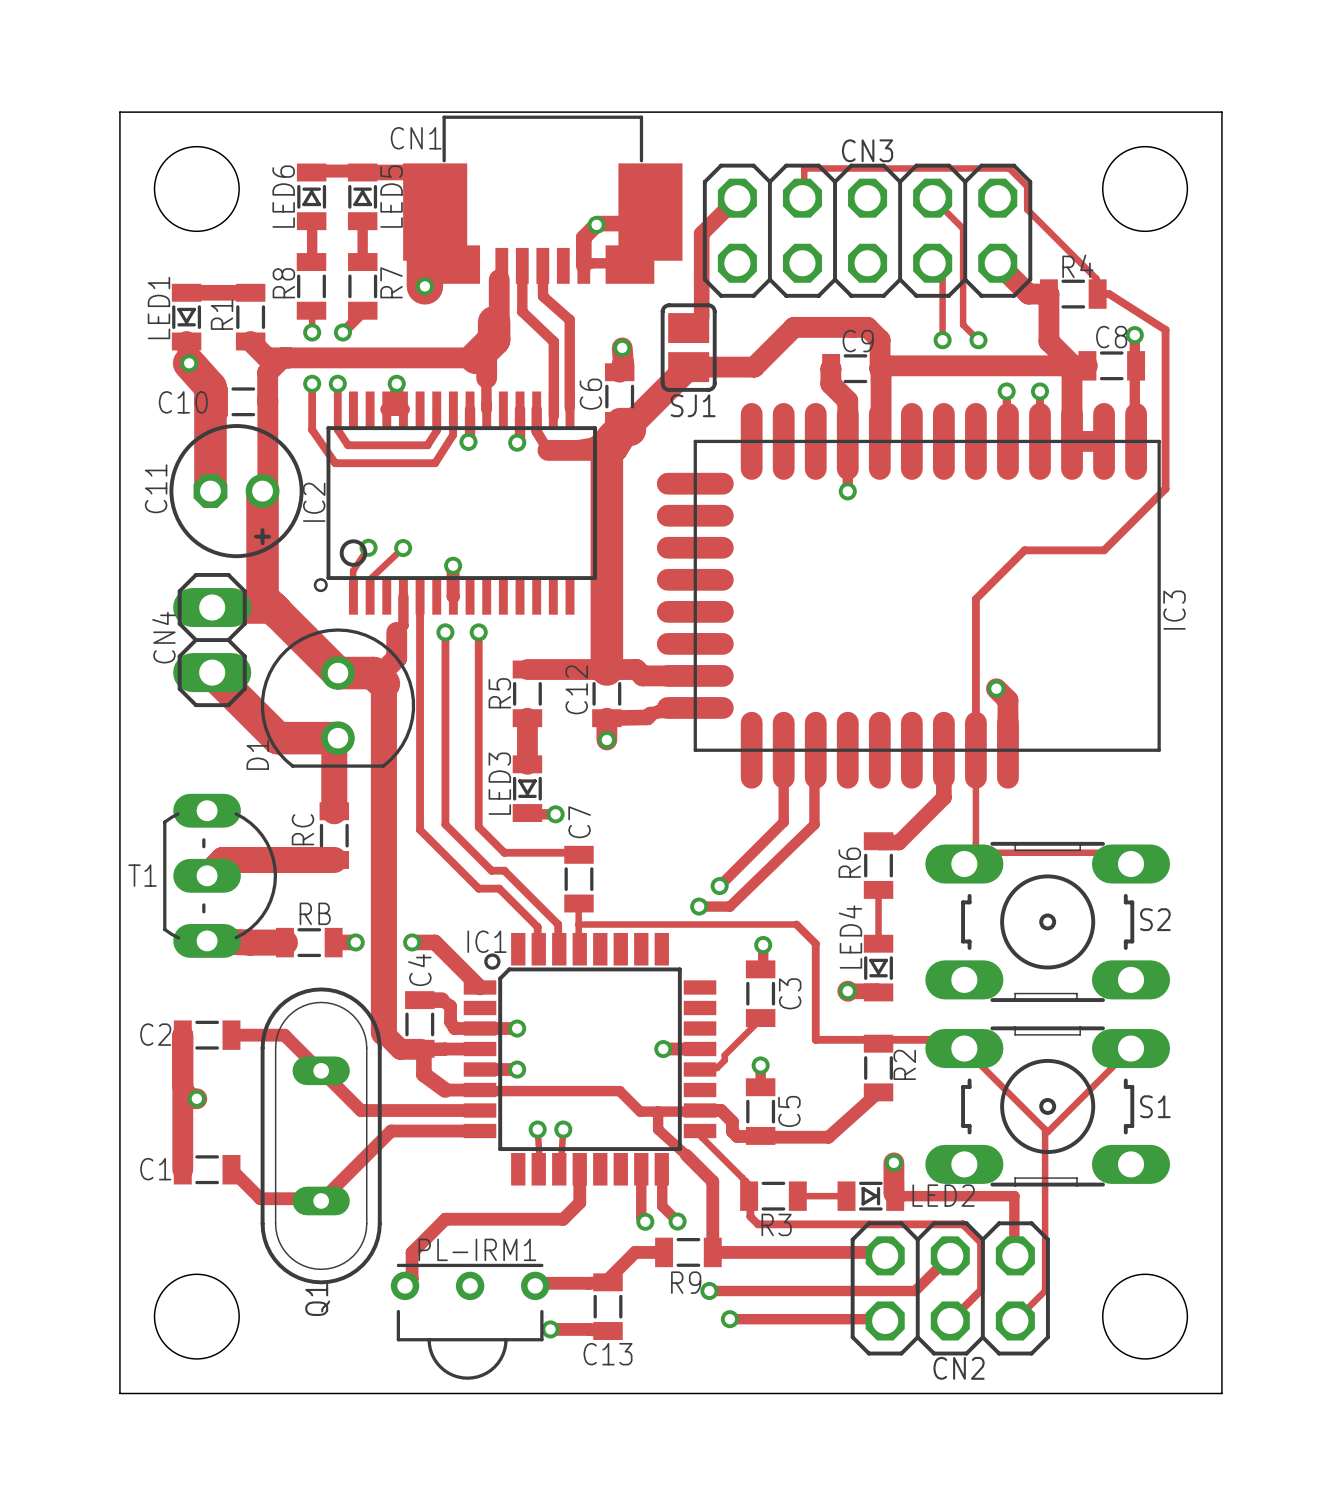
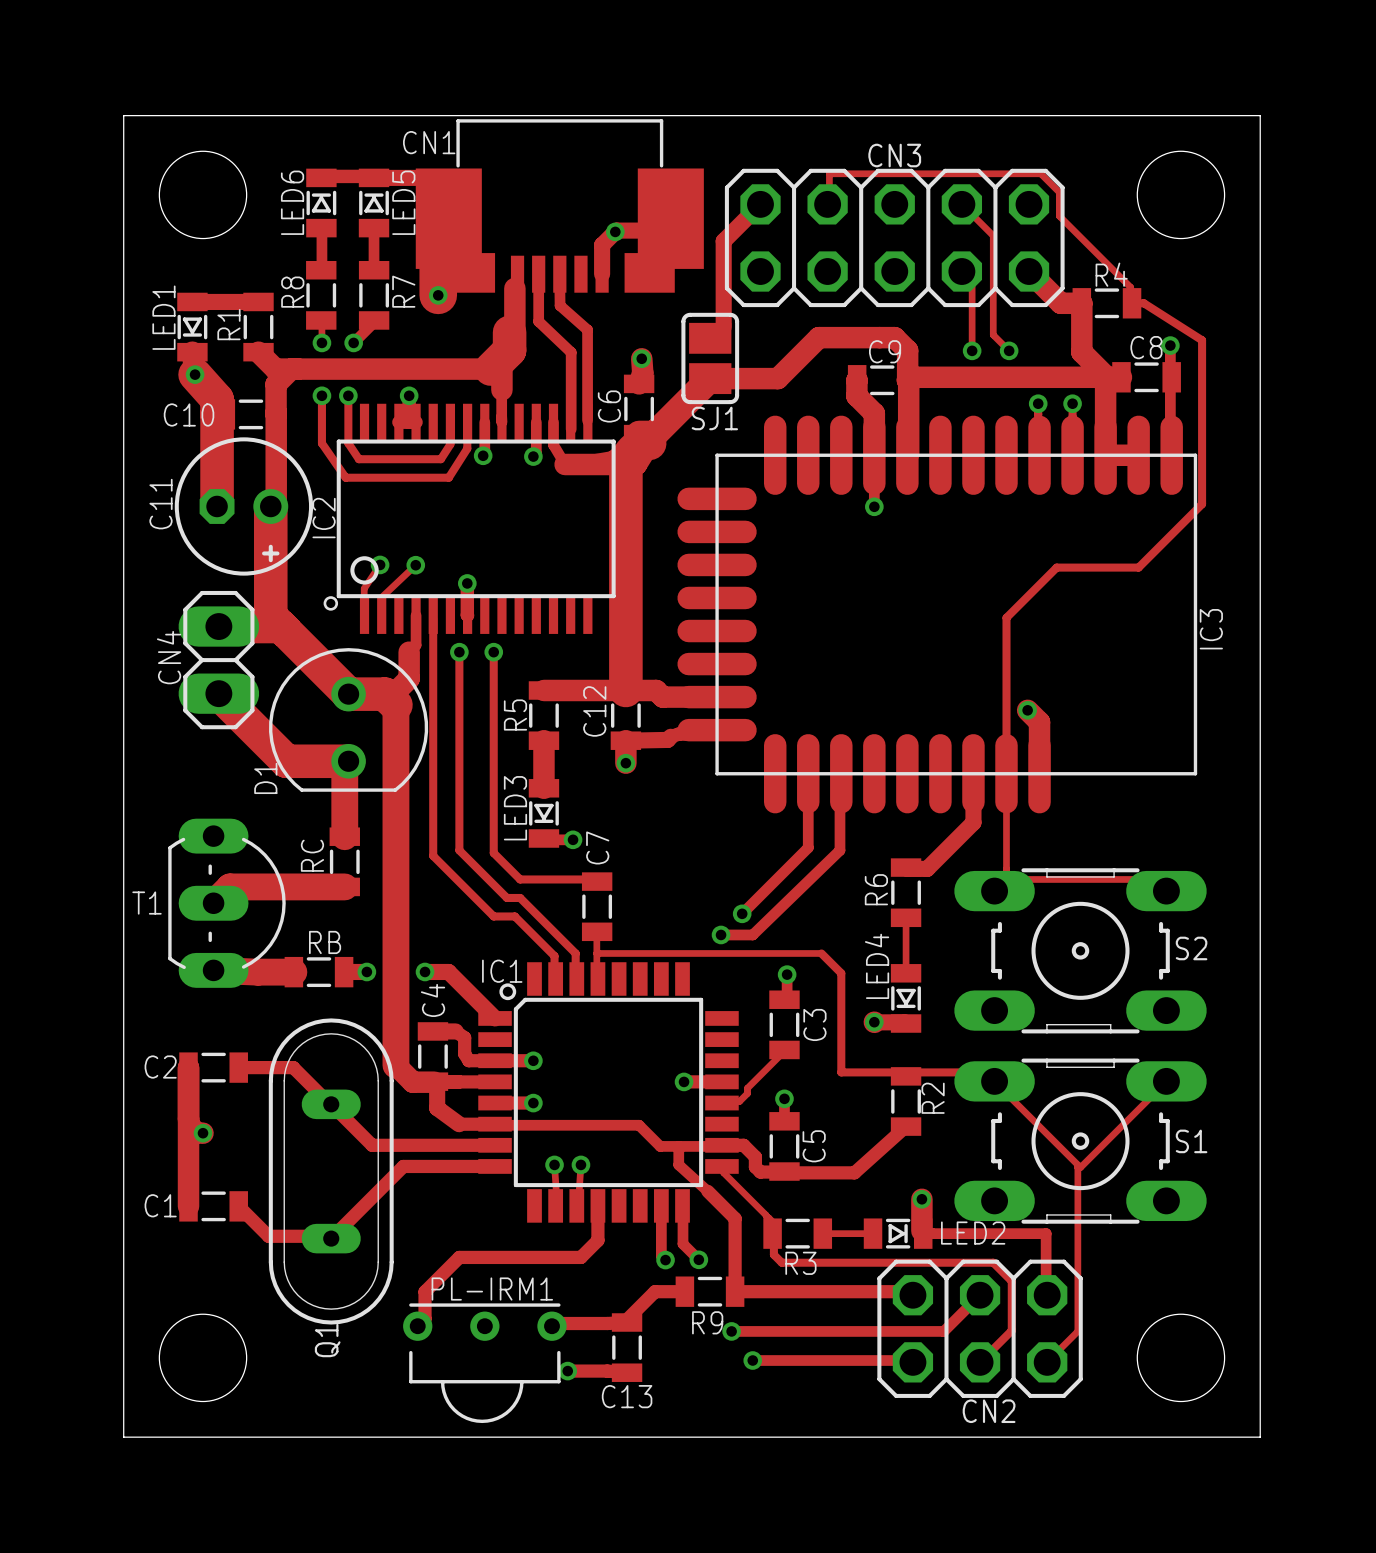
track: (583, 263) (612, 264) -> none

